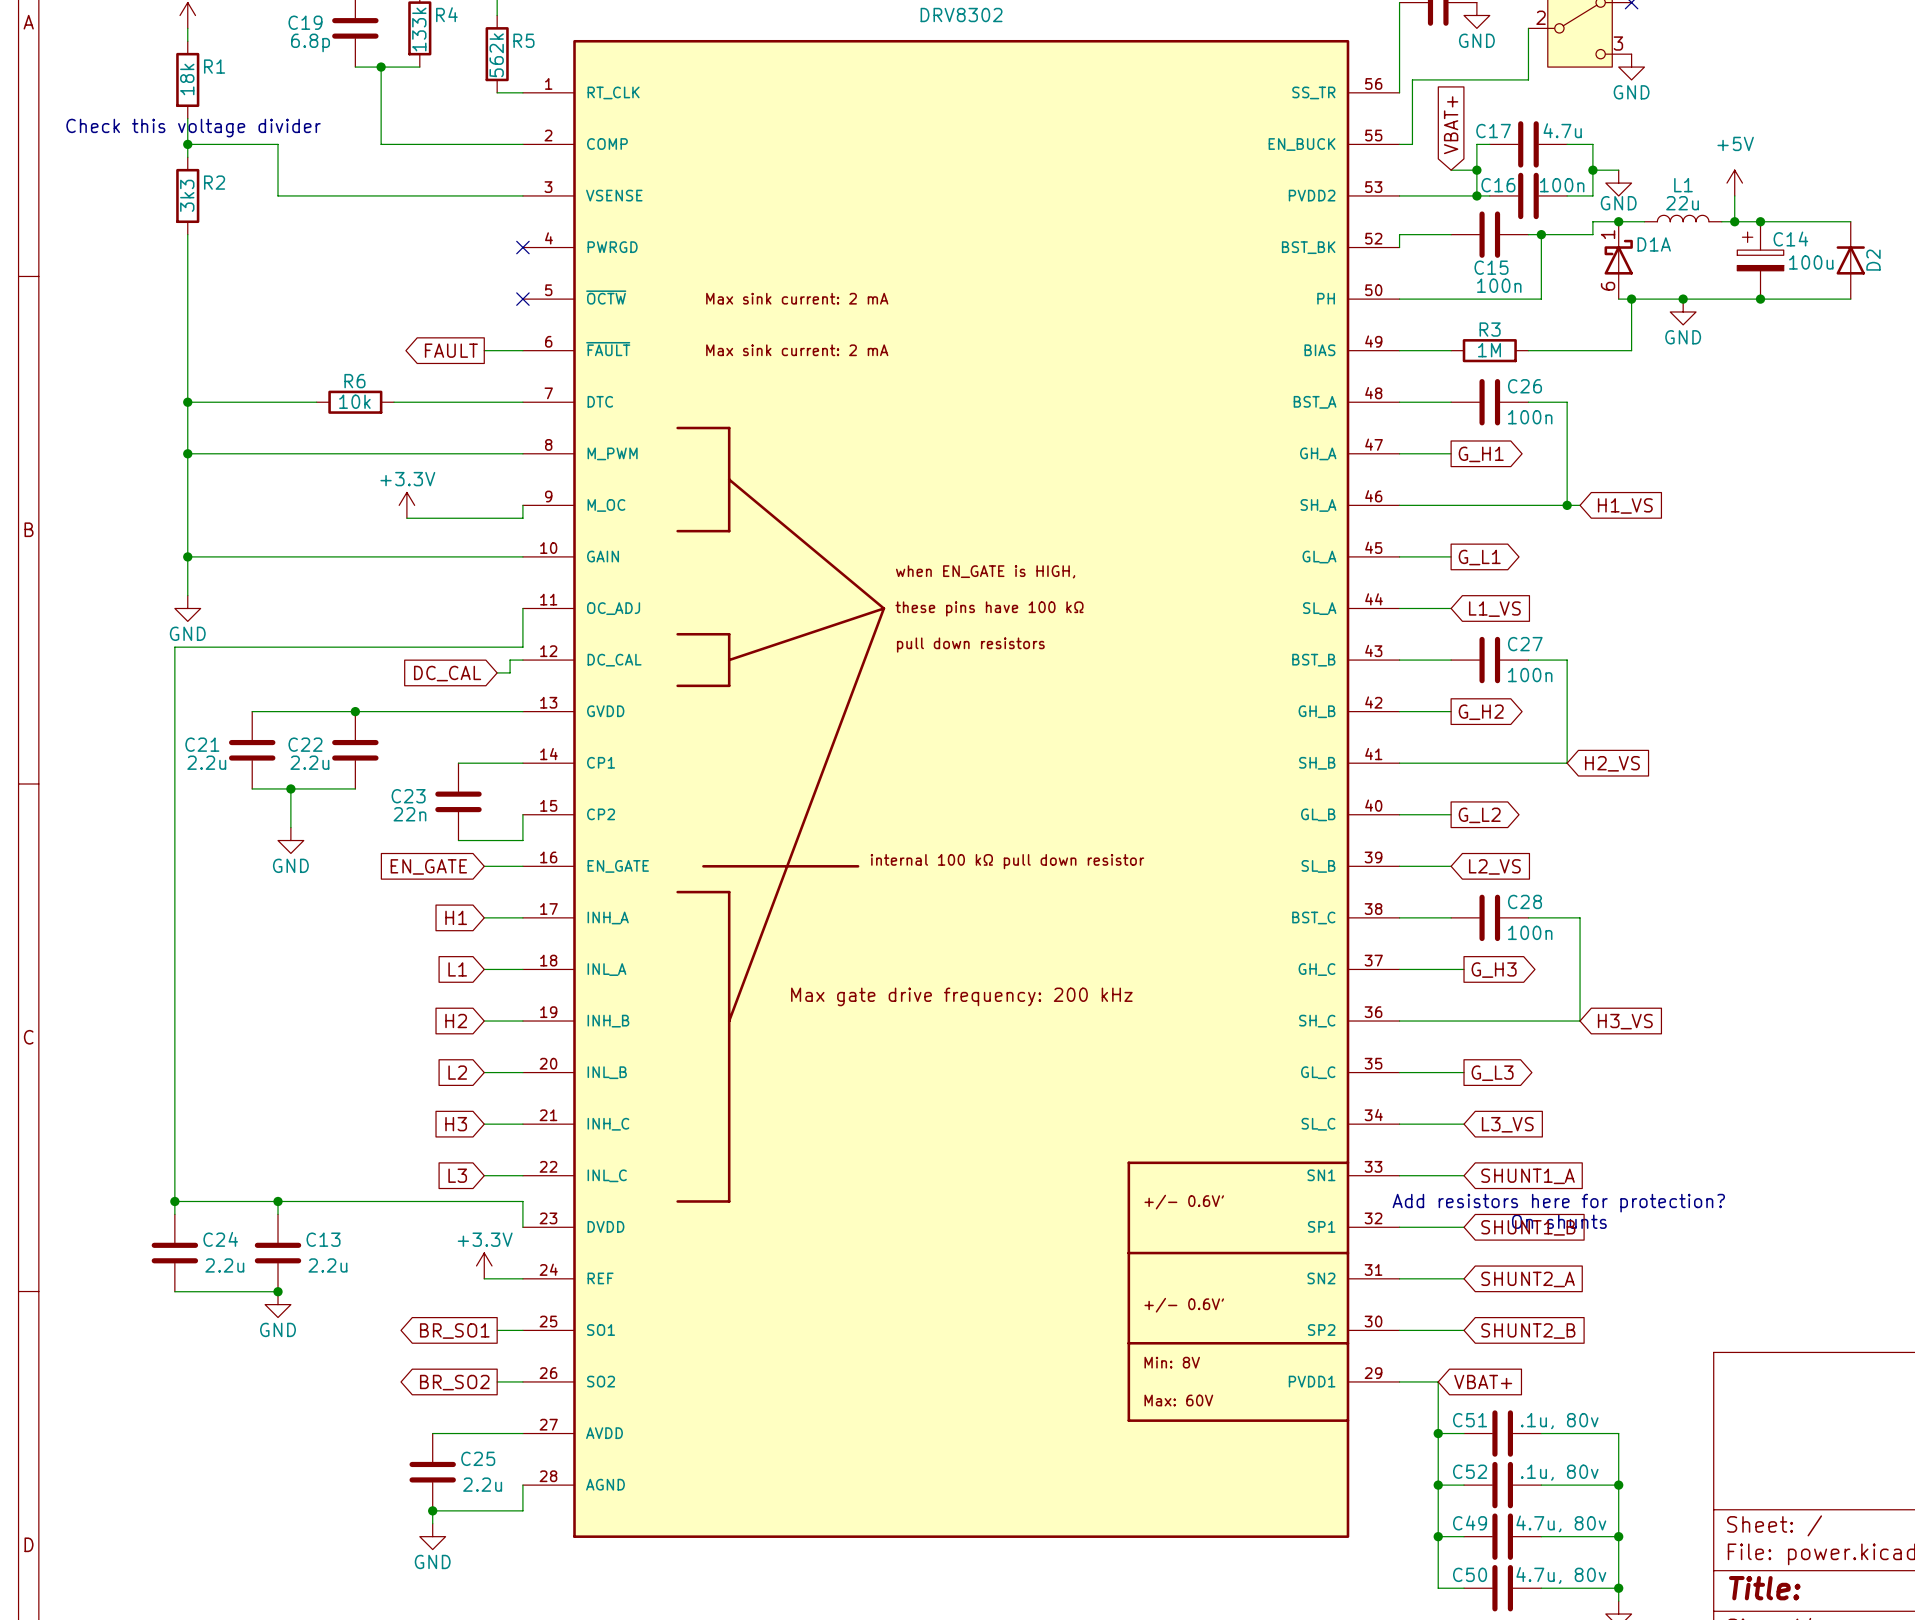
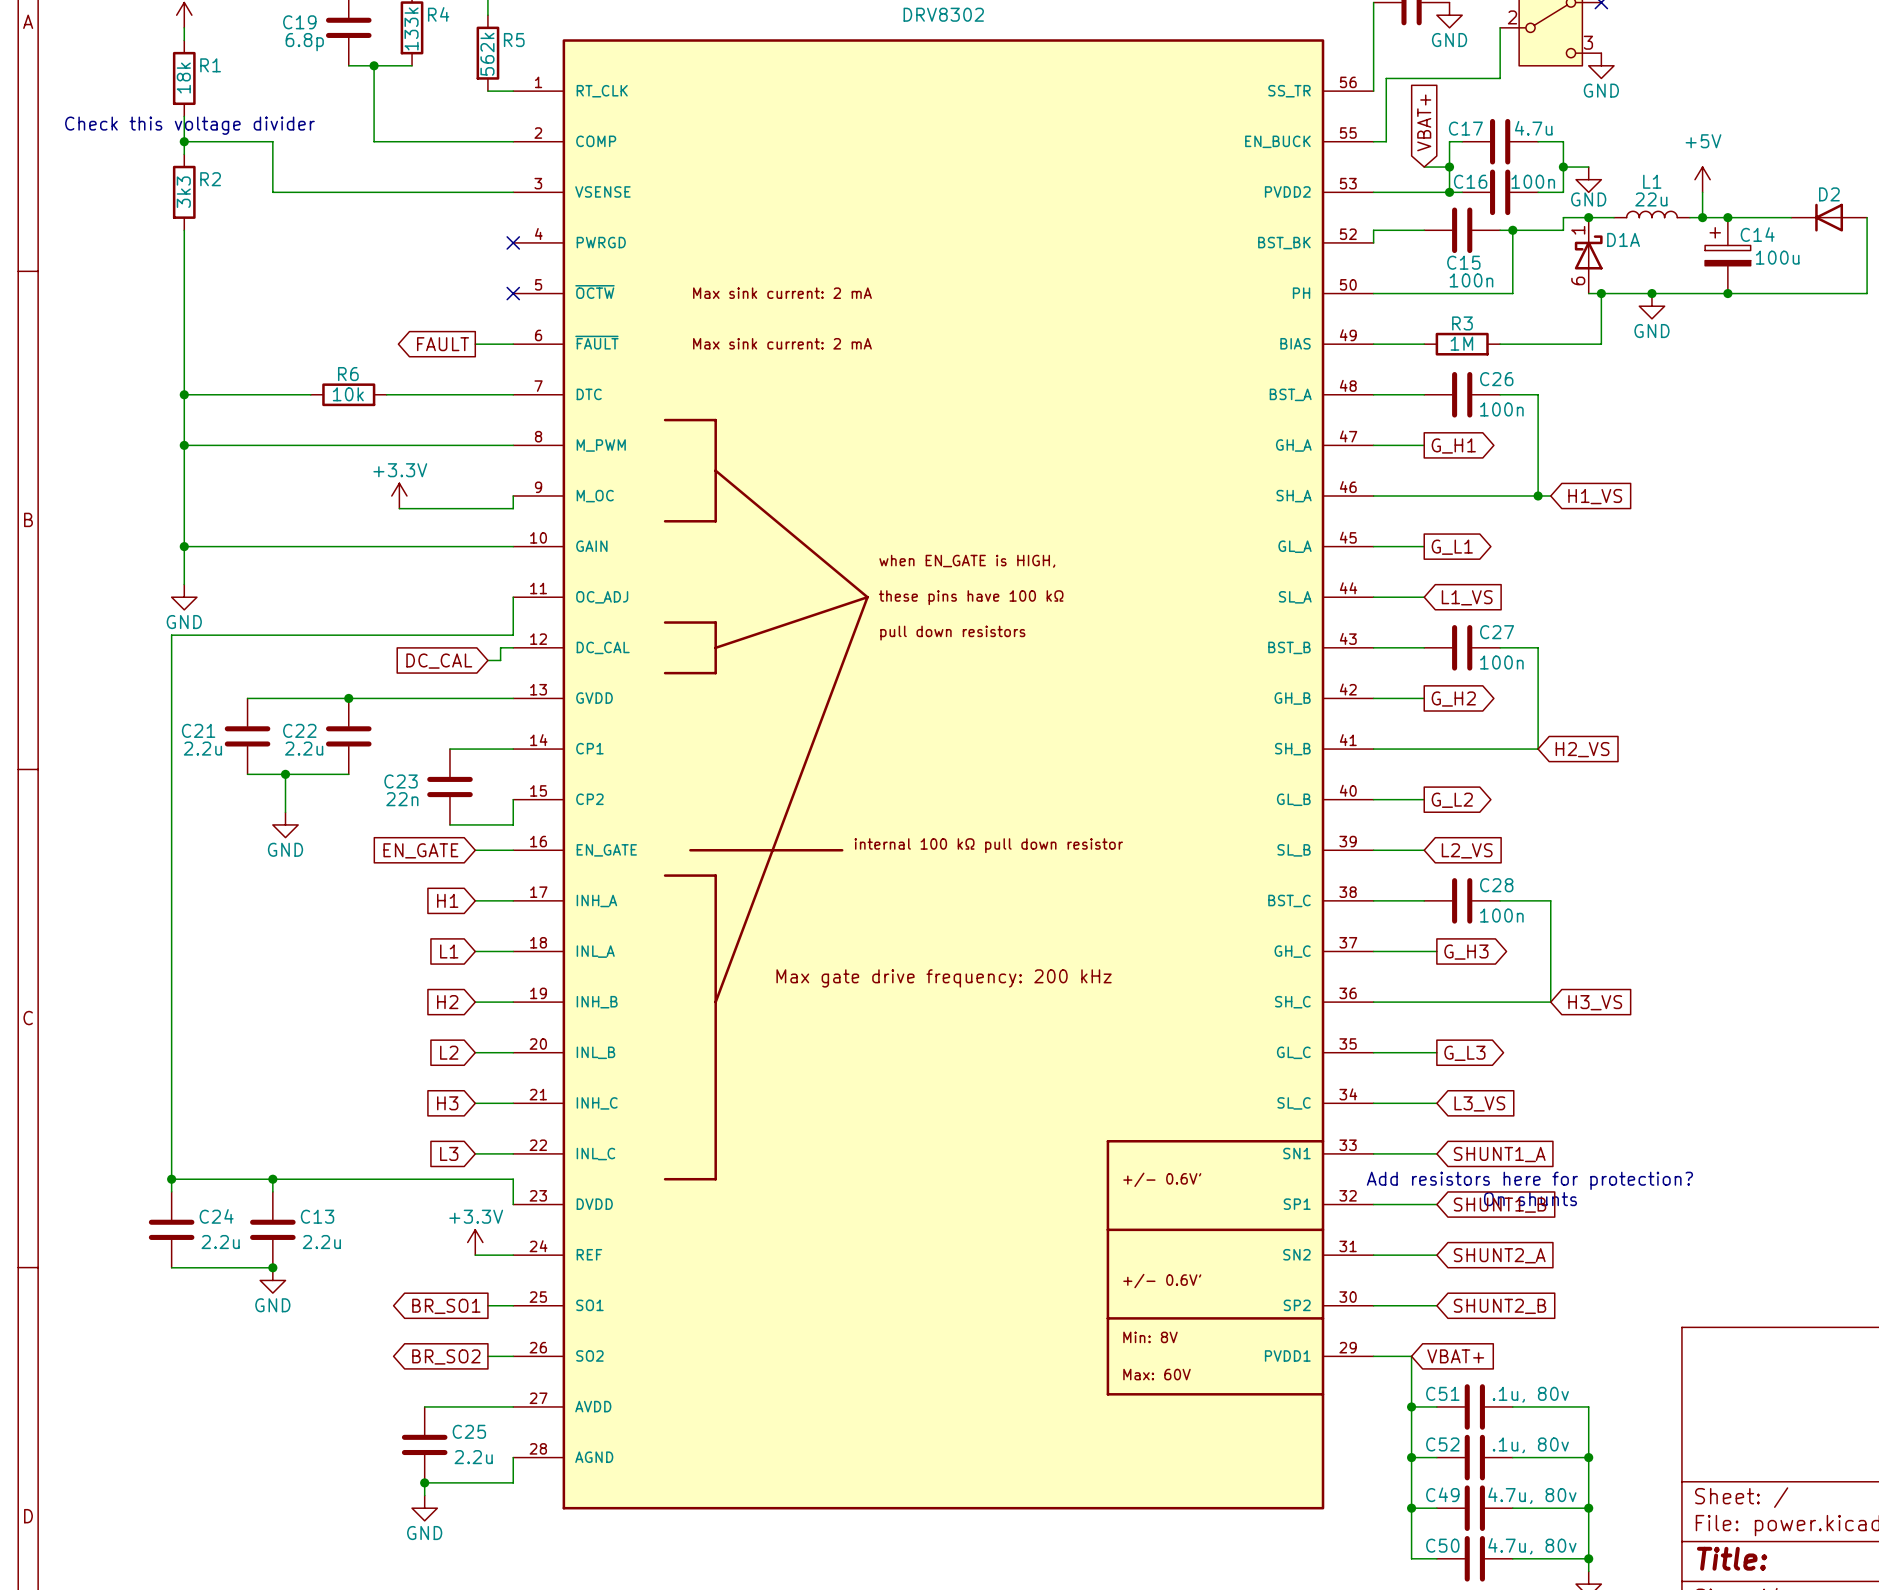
wire: none -> (1867, 217) (1867, 293) (1816, 293)
D2 rotation: 0° (1850, 260) -> 90° counterclockwise (1829, 217)

